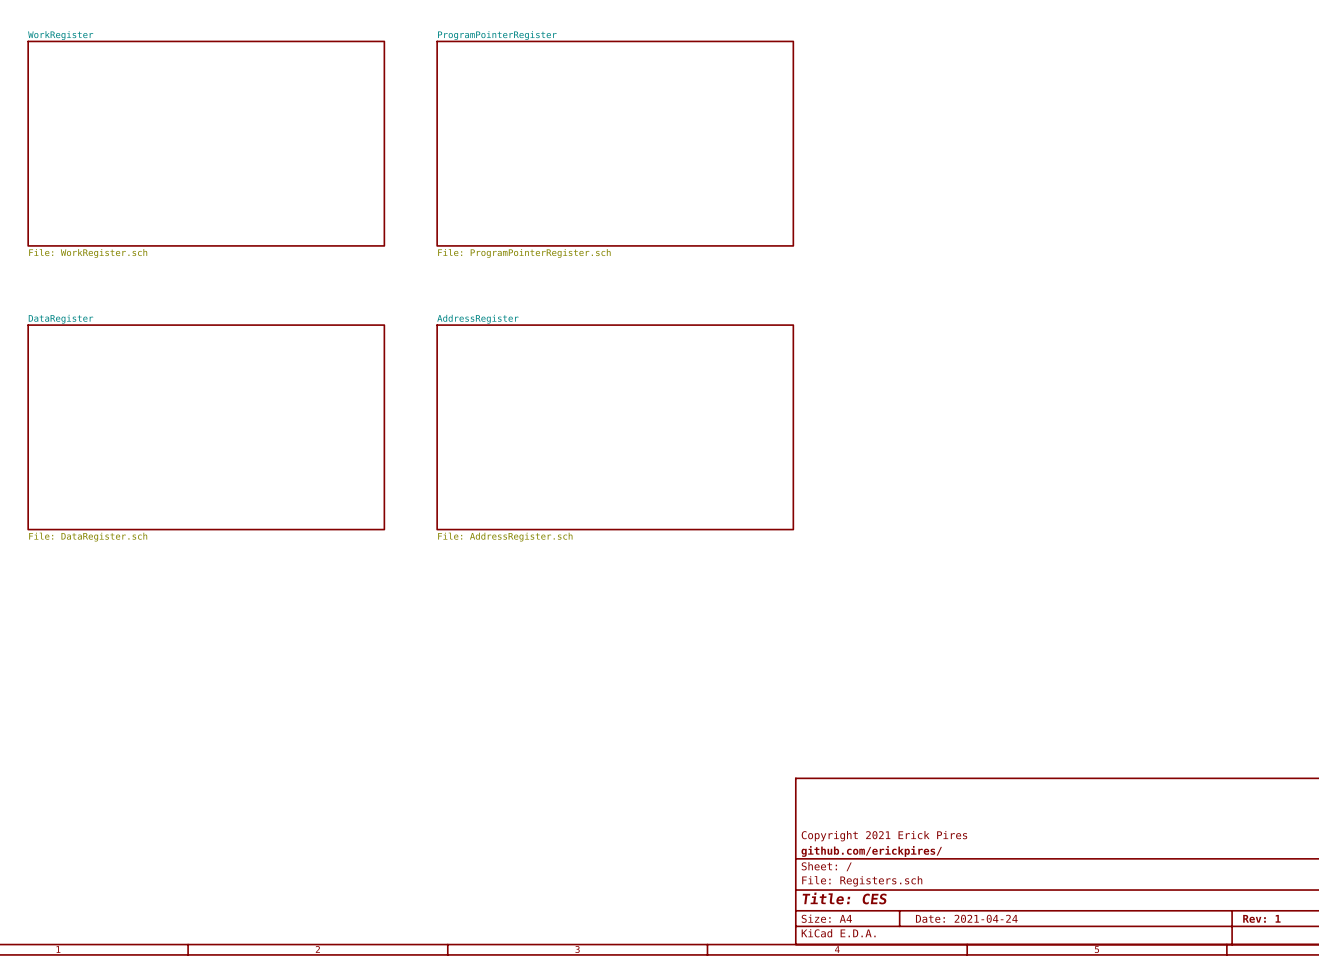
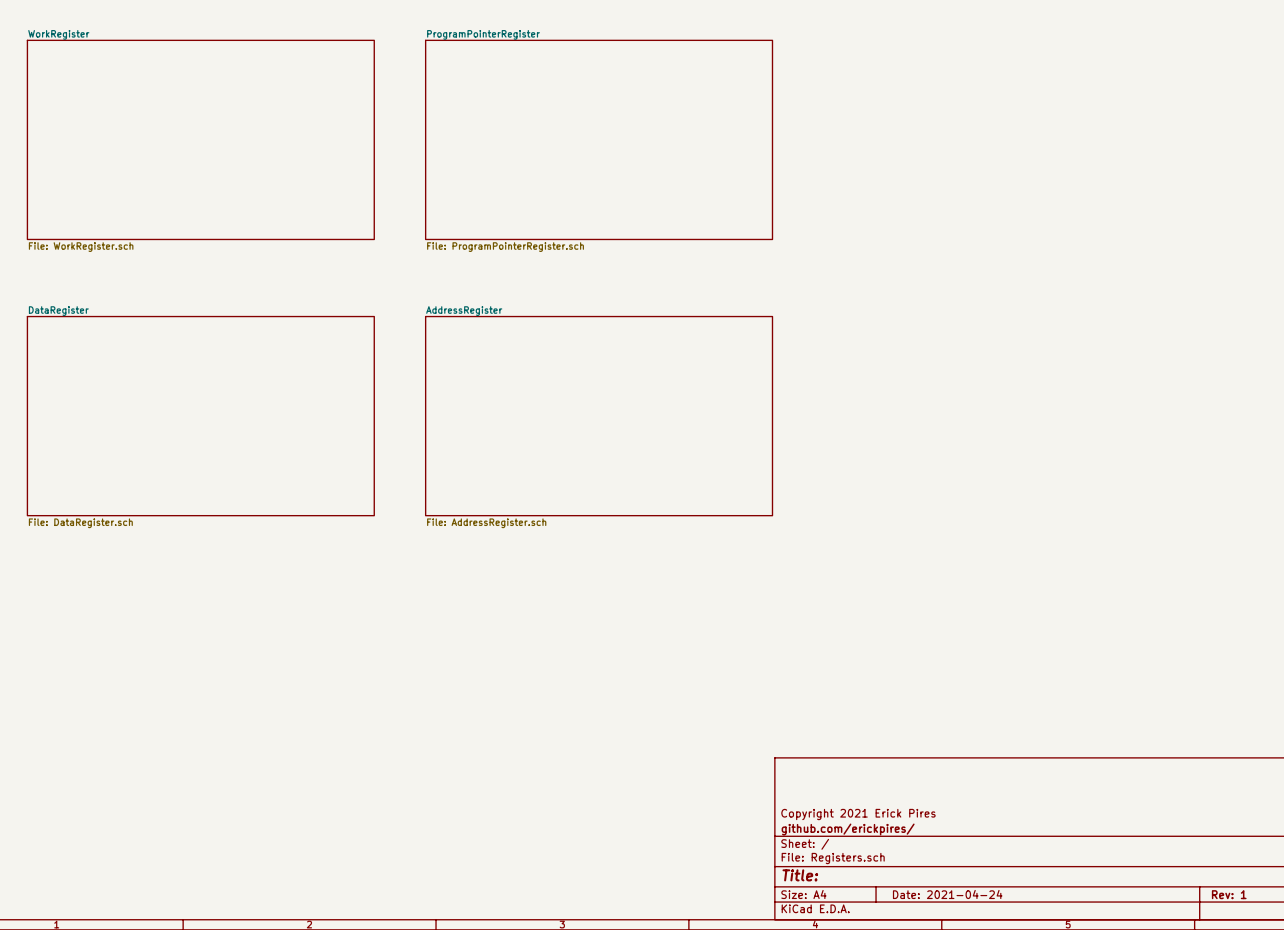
title block: Title: CES (844, 898) -> Title: (800, 875)

